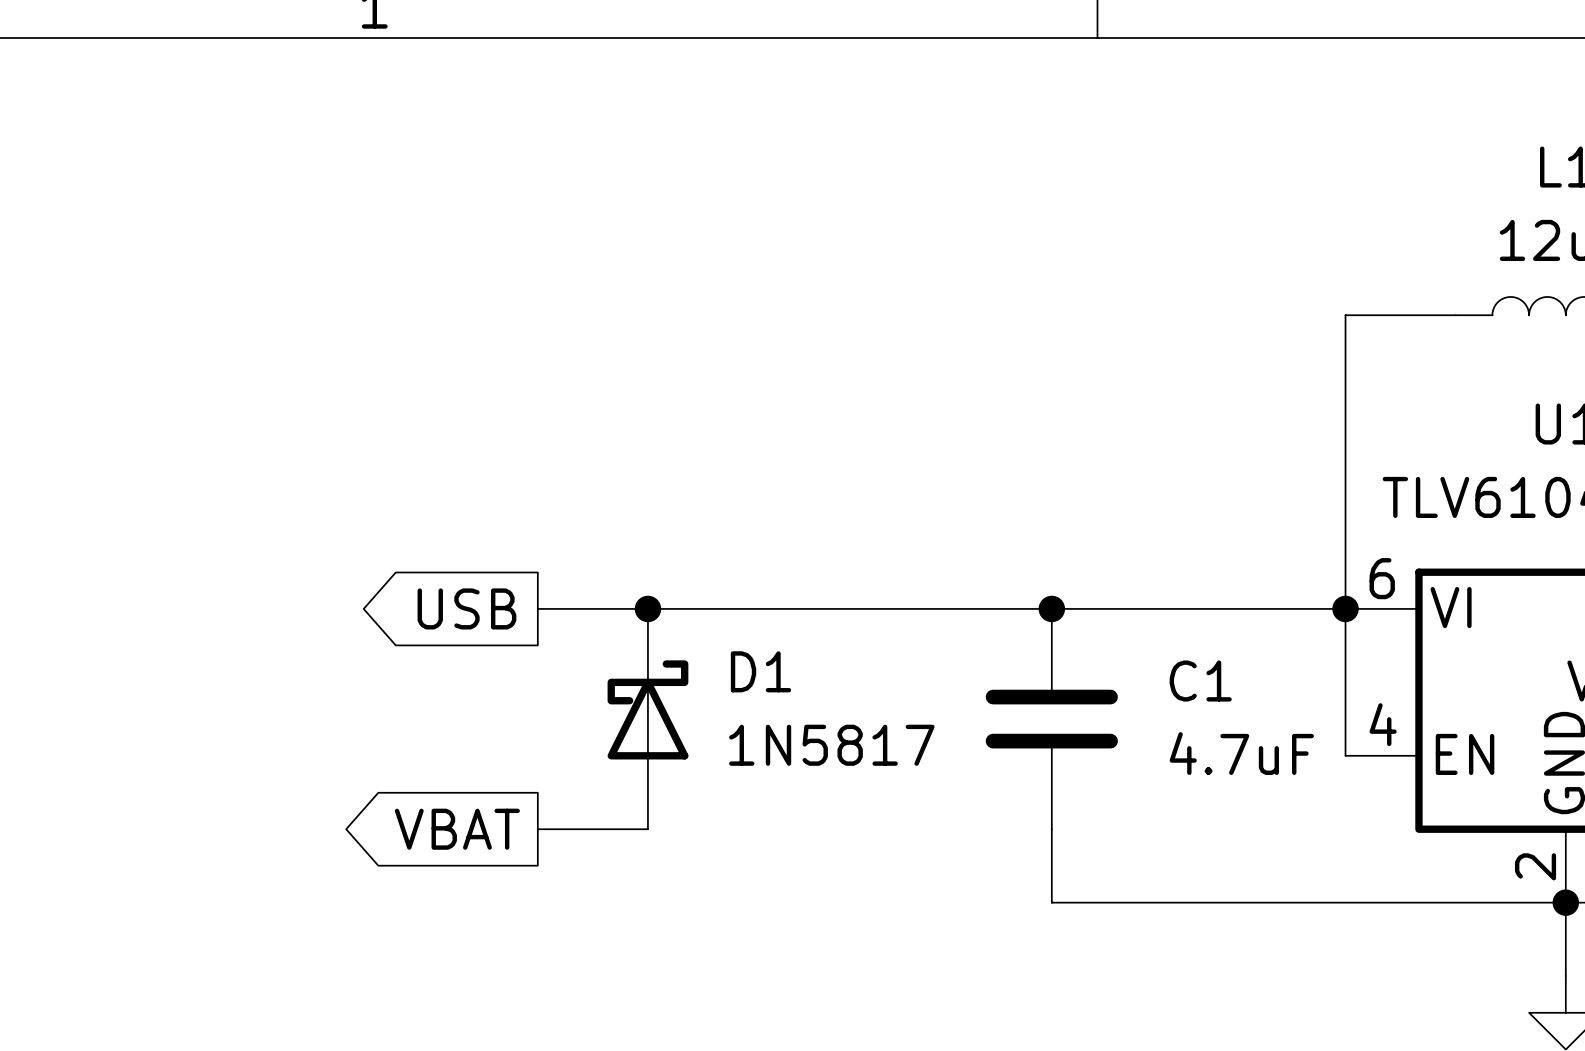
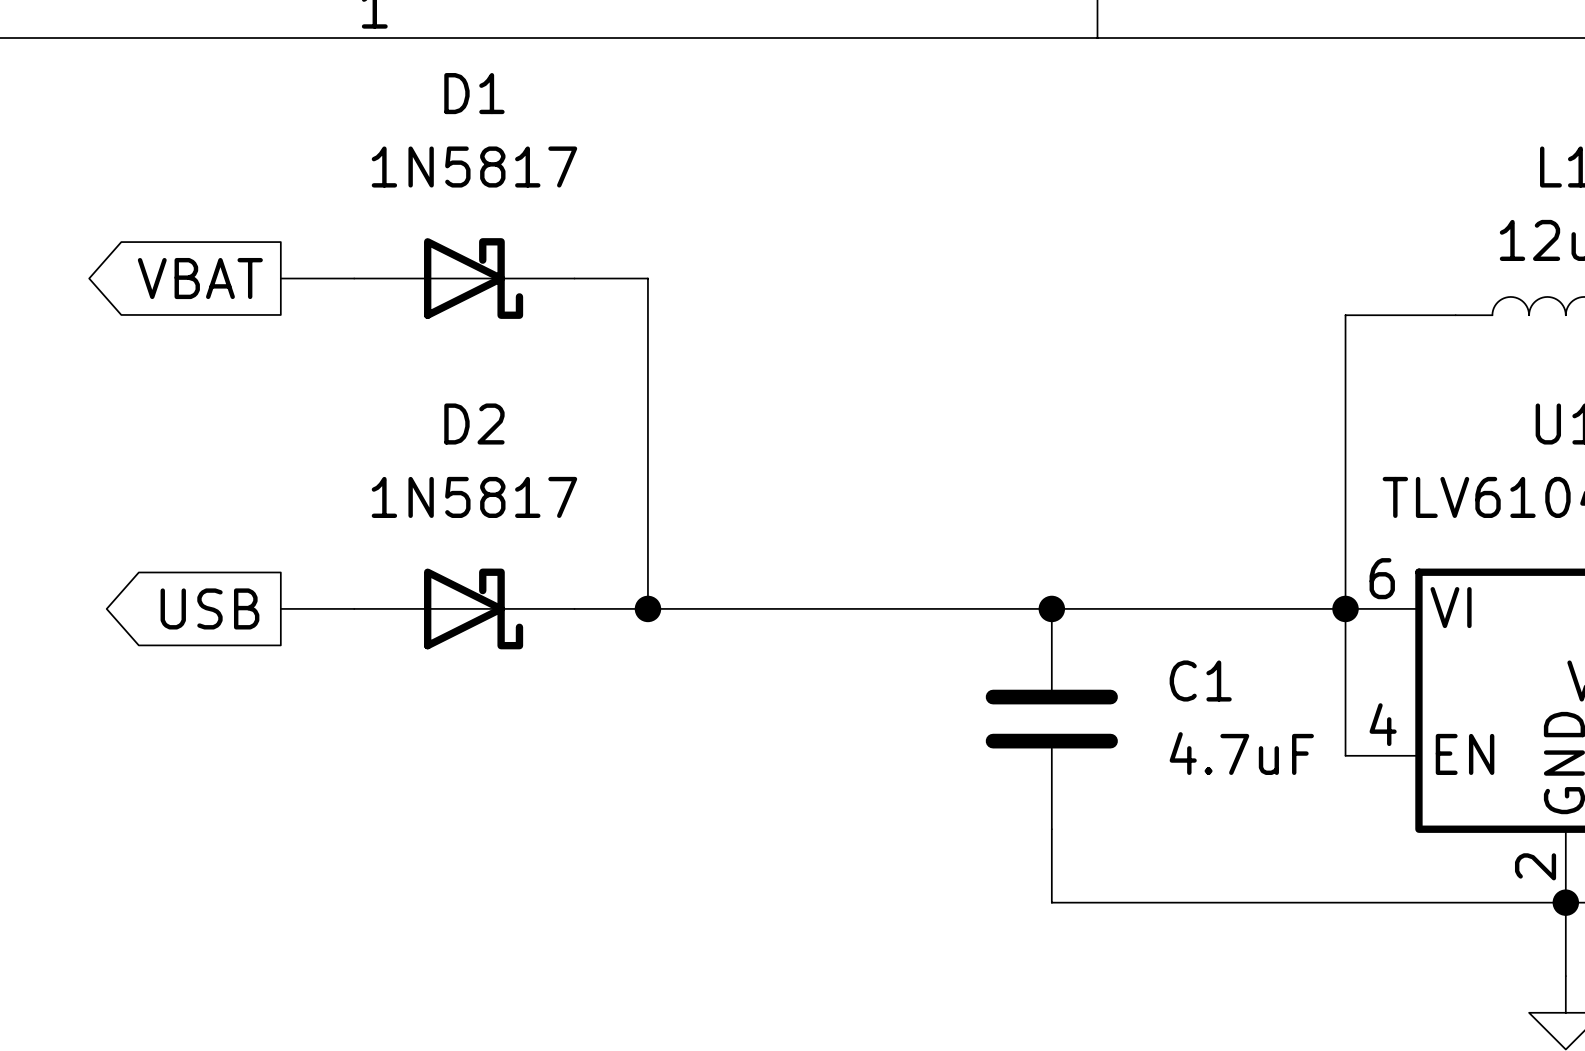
global label: none -> VBAT (200, 278)
wire: none -> (280, 278) (354, 278)
wire: none -> (574, 278) (647, 278) (647, 608)
wire: none -> (280, 608) (354, 608)
D2: none -> 1N5817 (464, 608)
global label position: USB (466, 608) -> USB (209, 608)
D1 name position: D1 (761, 671) -> D1 (474, 93)
D1 rotation: 0° (647, 709) -> 90° clockwise (473, 278)
D1 position: (647, 719) -> (464, 278)
D1 value position: 1N5817 (831, 745) -> 1N5817 (474, 167)
global label: VBAT (457, 829) -> none
wire: (537, 829) (647, 829) -> none

